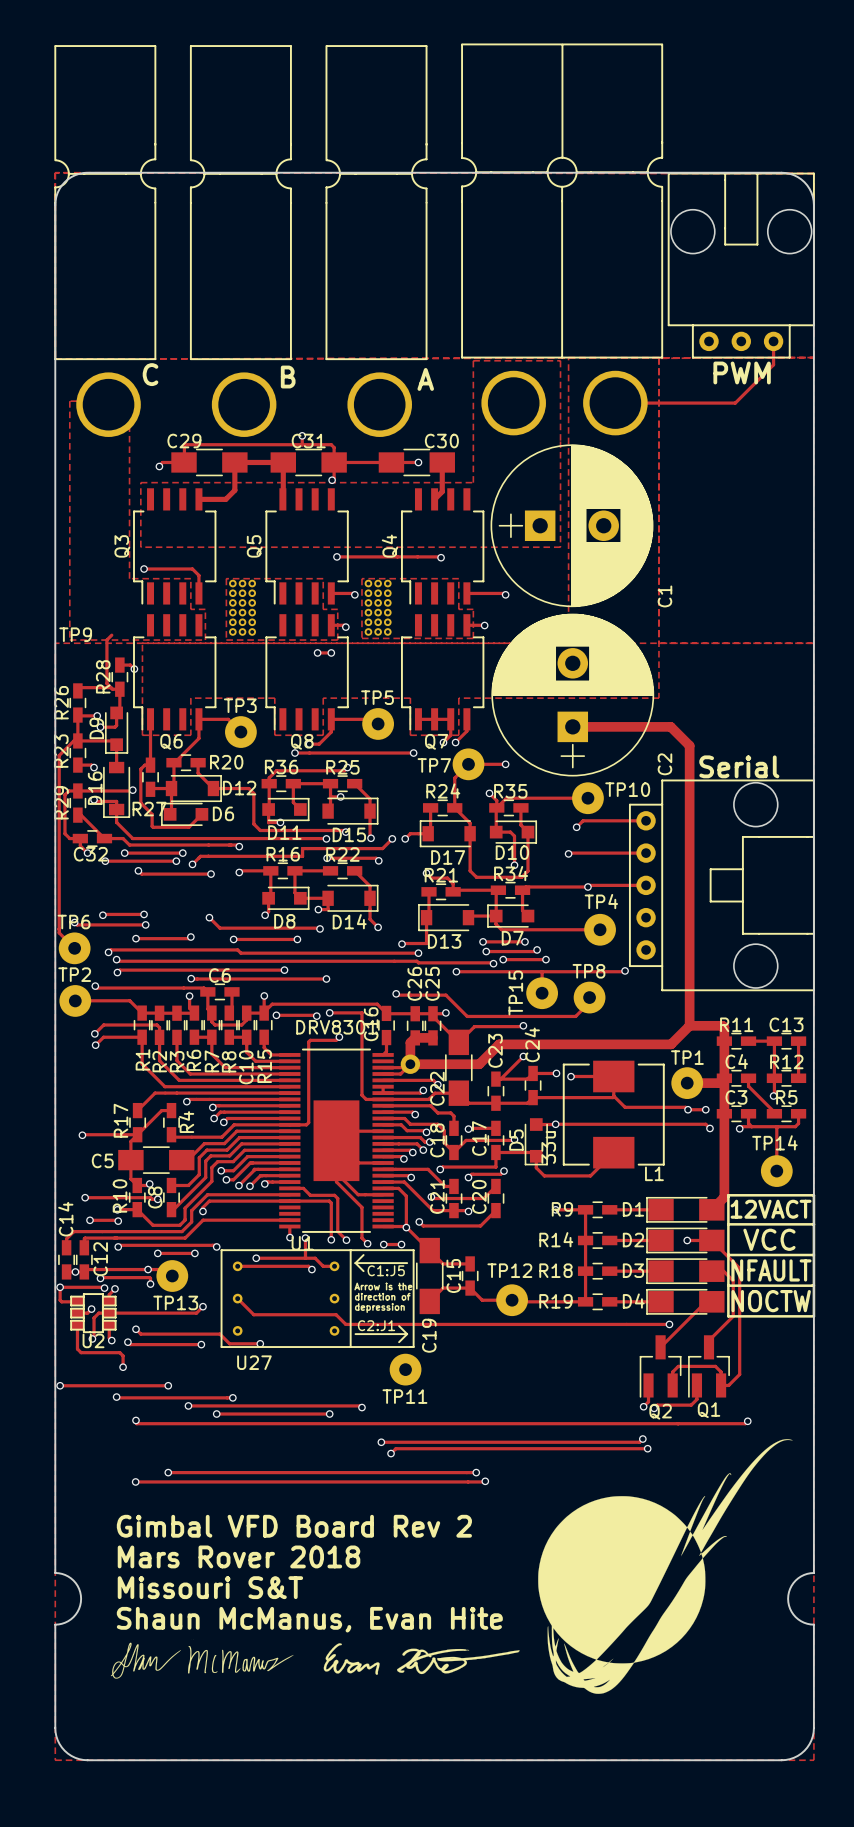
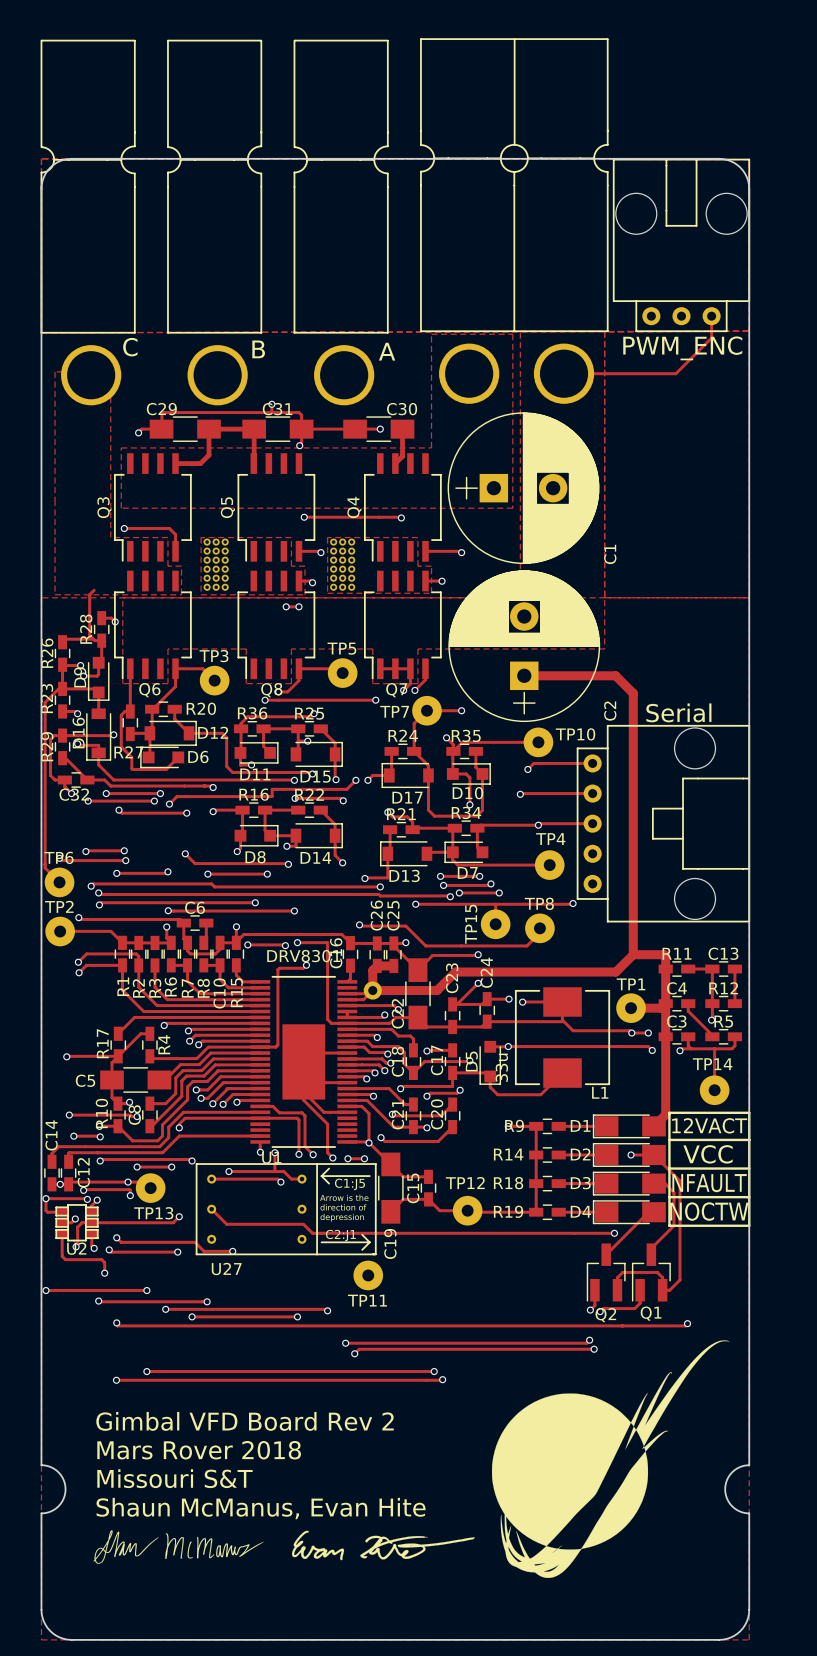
text: PWM (742, 372) -> PWM_ENC (682, 348)
TP9: (75, 634) -> none

